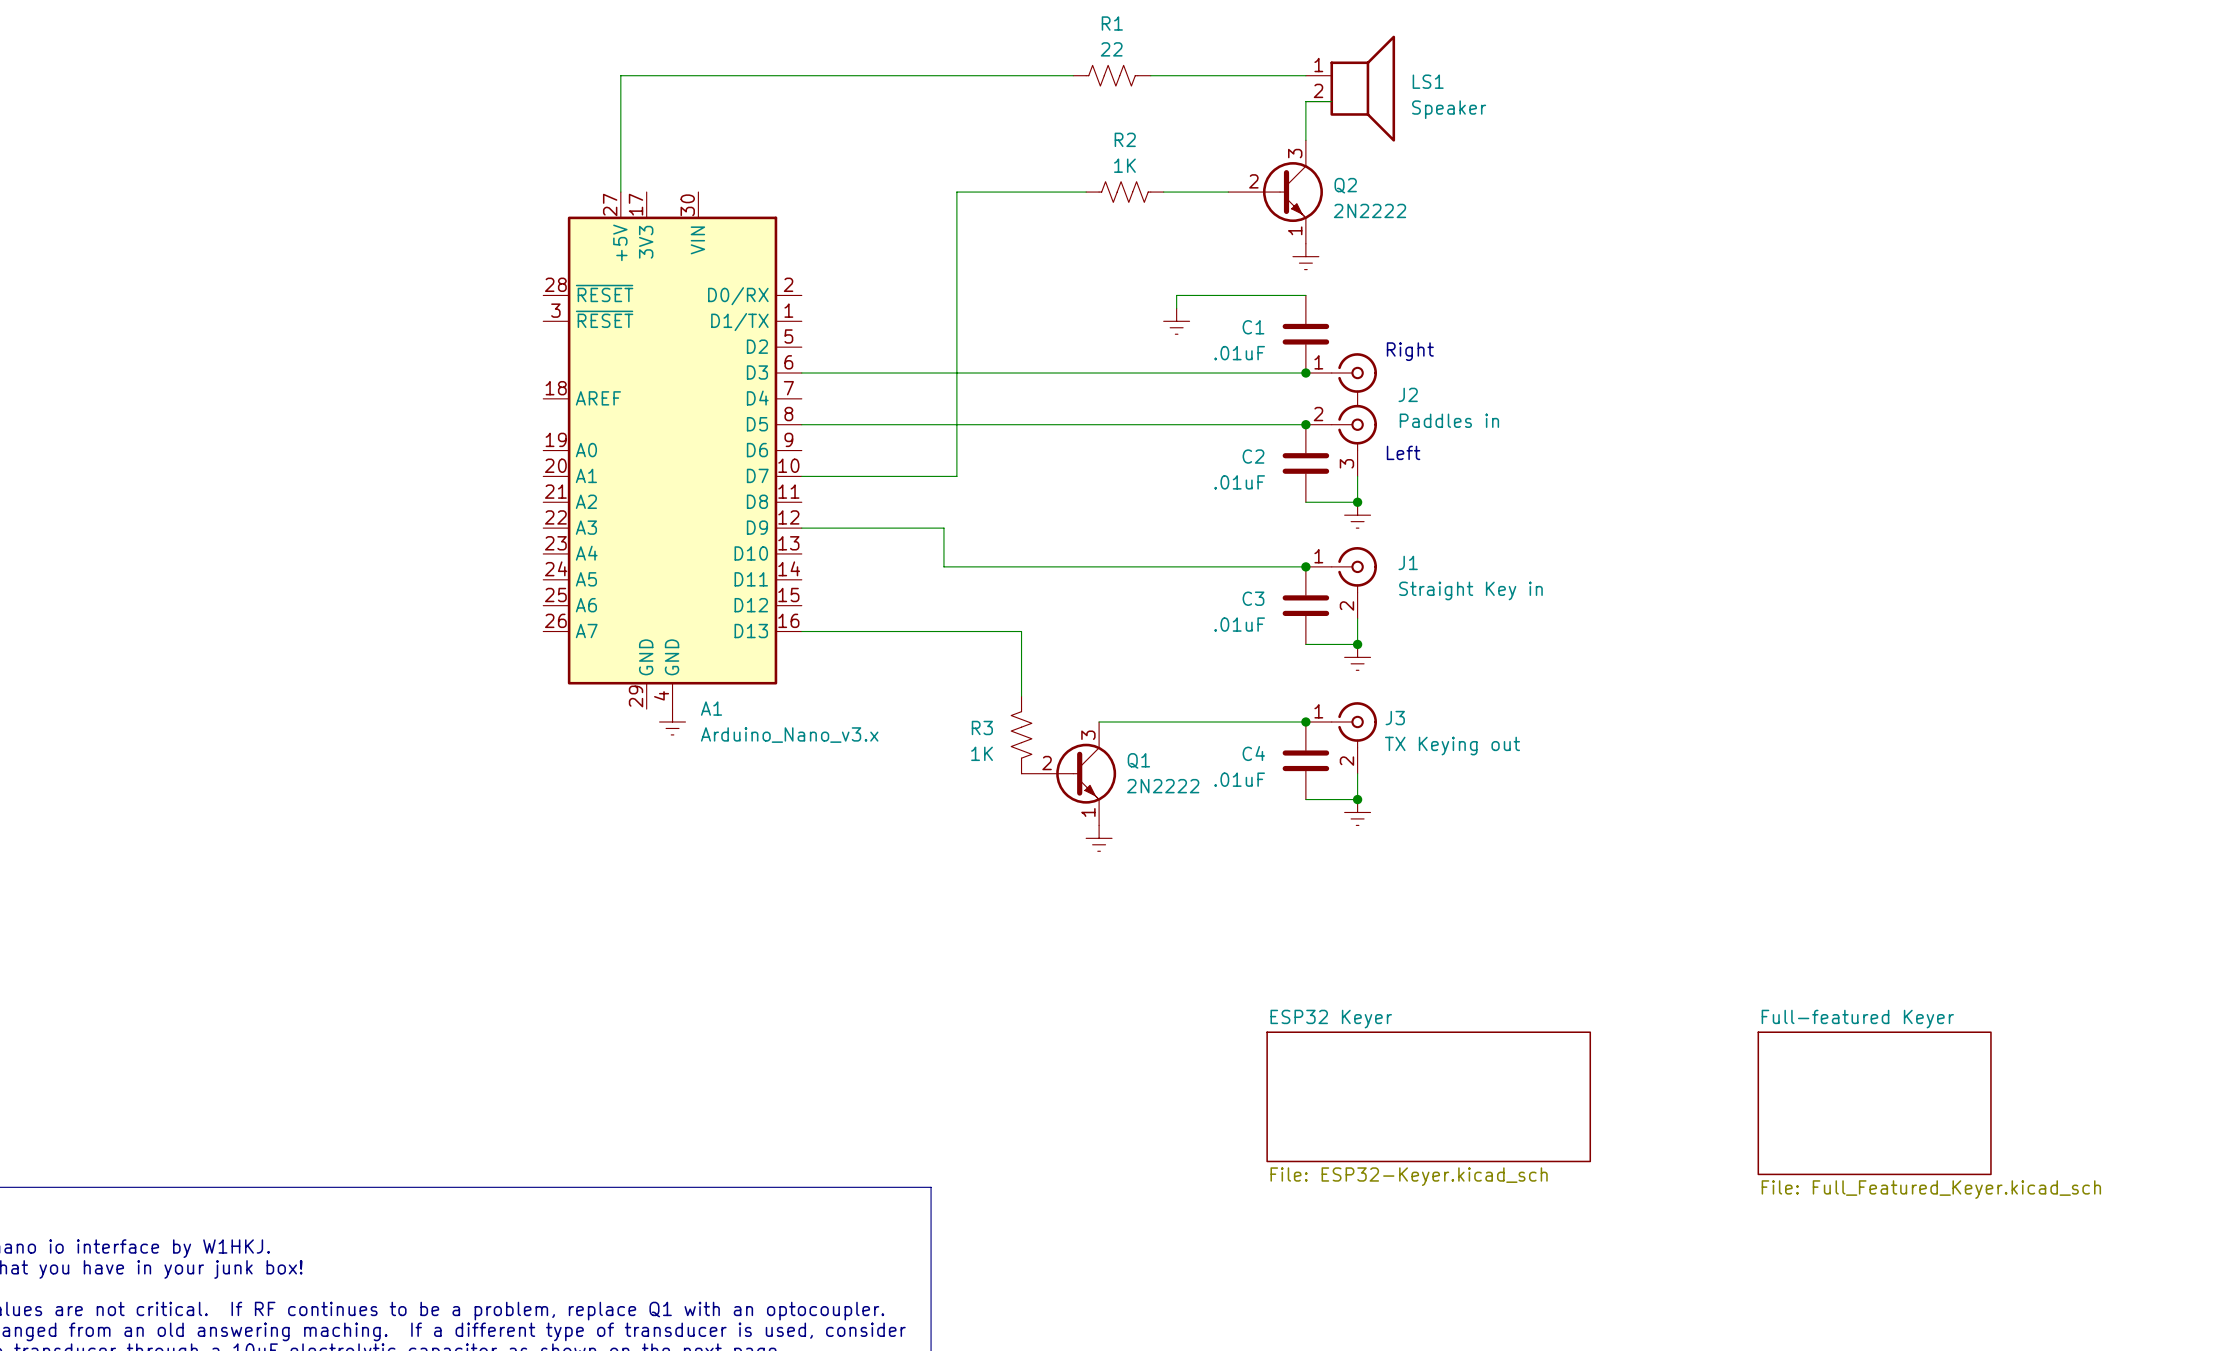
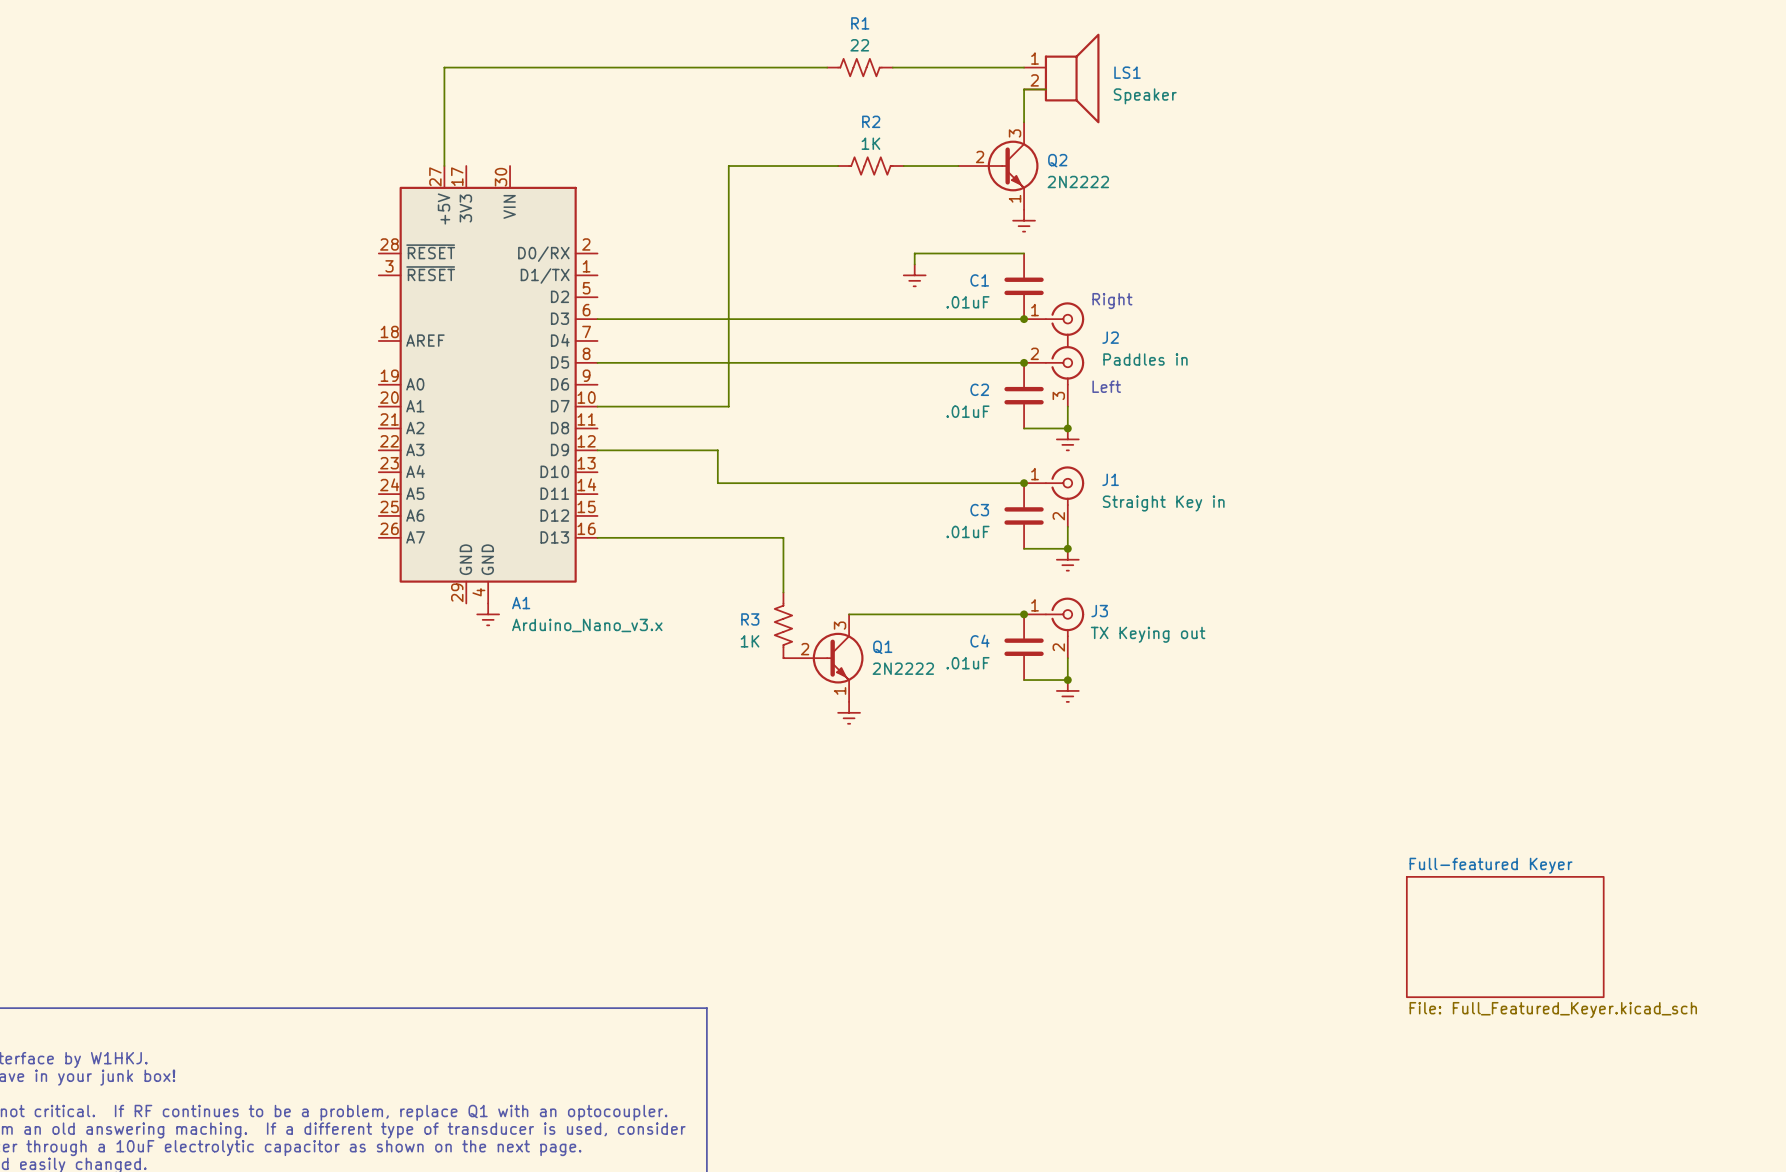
sheet ESP32 Keyer: File: ESP32-Keyer.kicad_sch (1428, 1096) -> none

